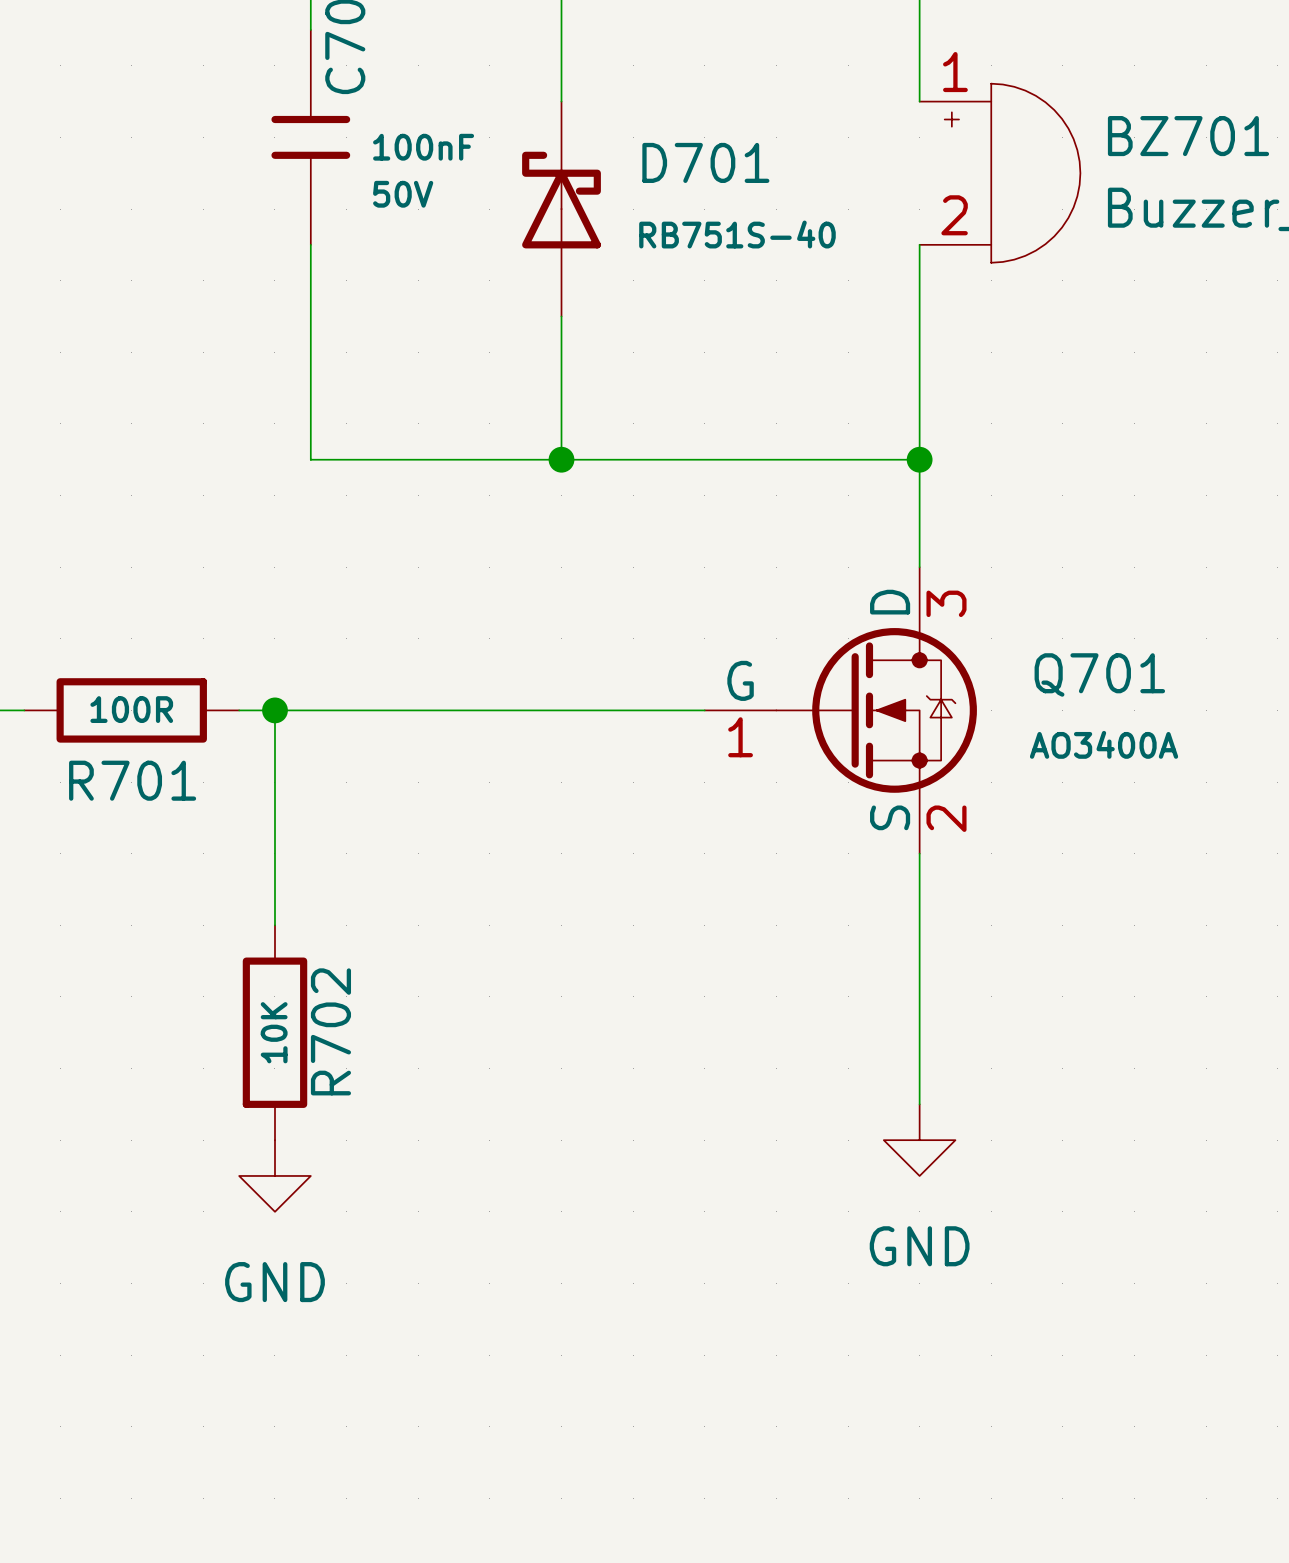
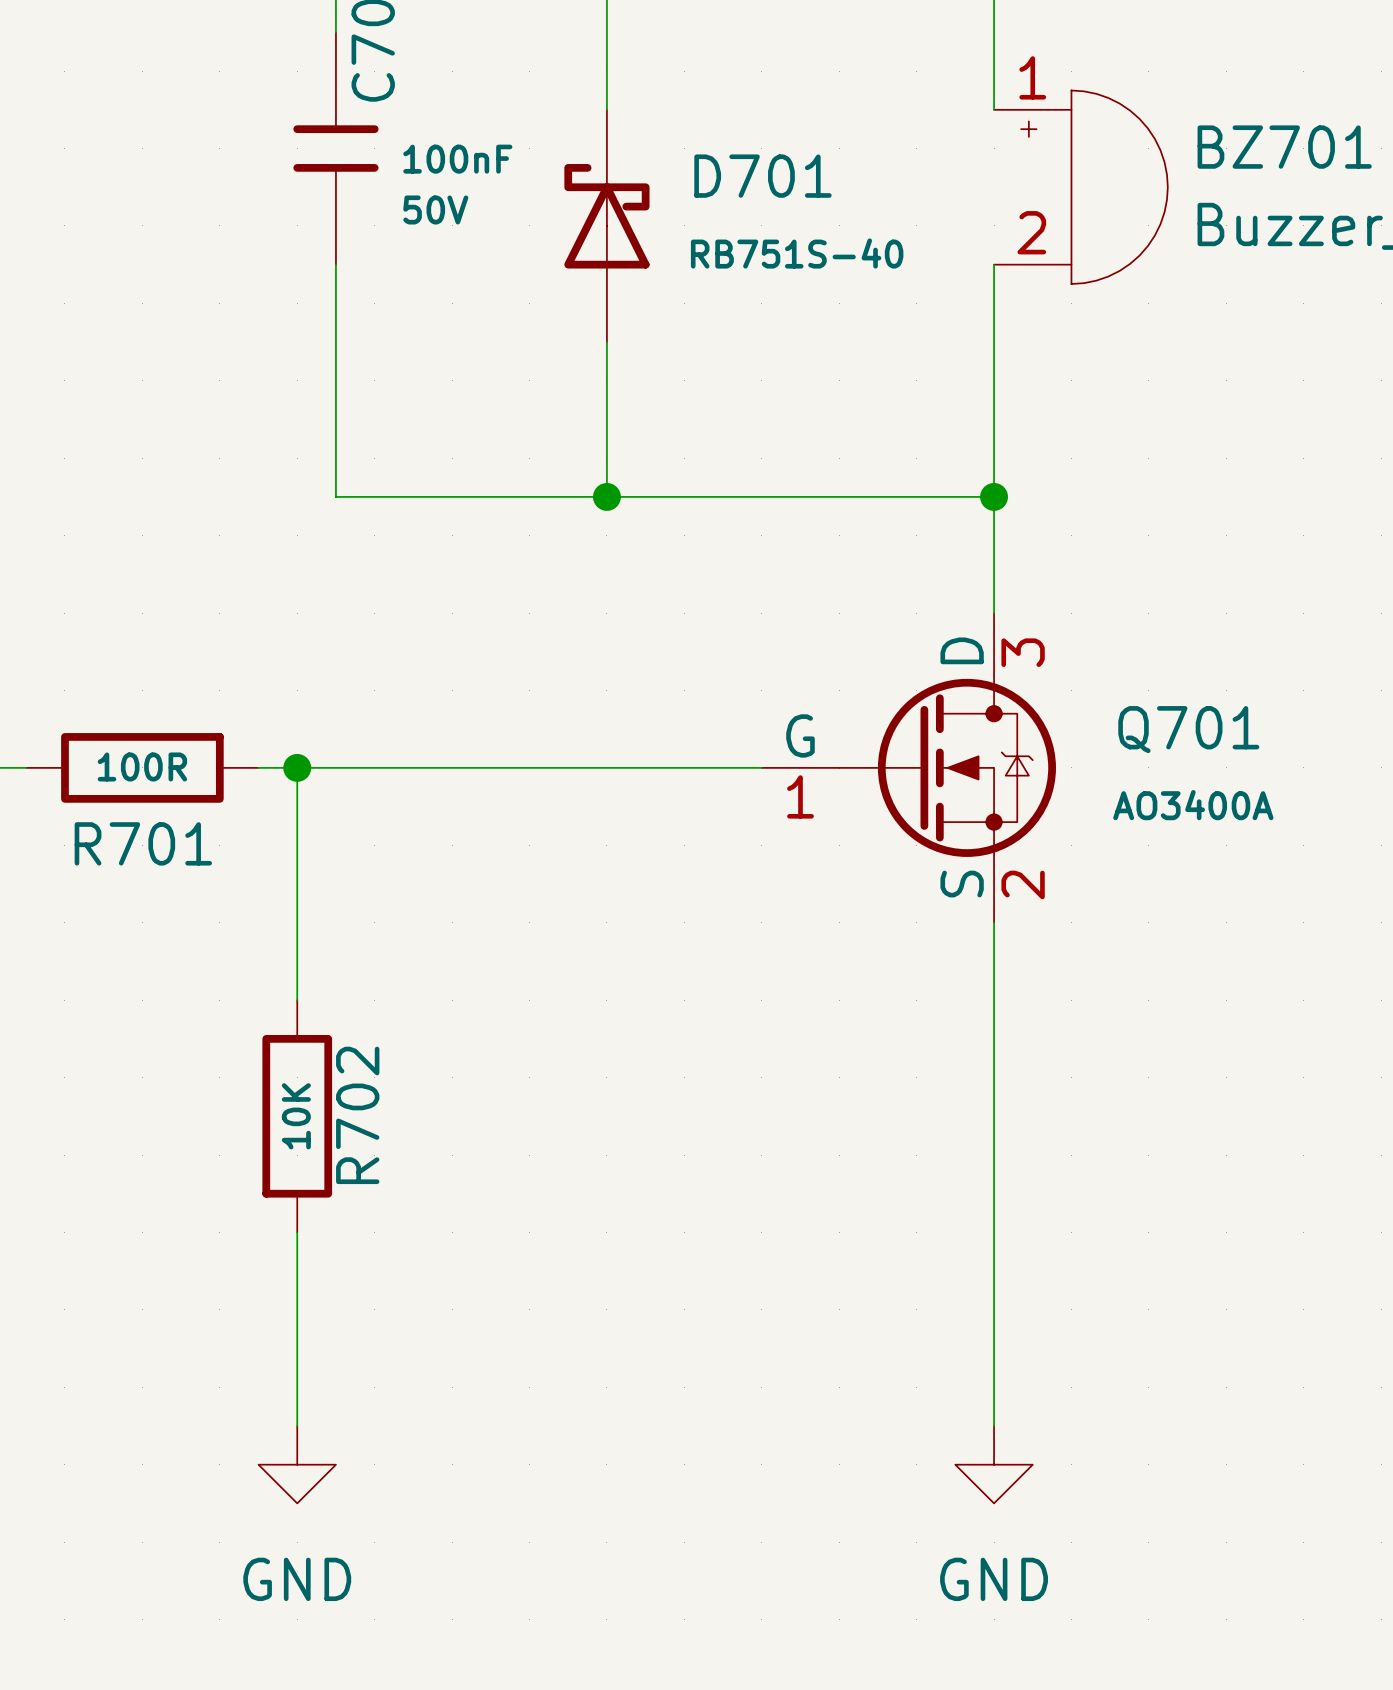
wire: none -> (994, 1193) (994, 1425)
wire: none -> (297, 1232) (297, 1425)
power symbol position: GND (919, 1140) -> GND (994, 1464)
power symbol position: GND (274, 1175) -> GND (297, 1464)

